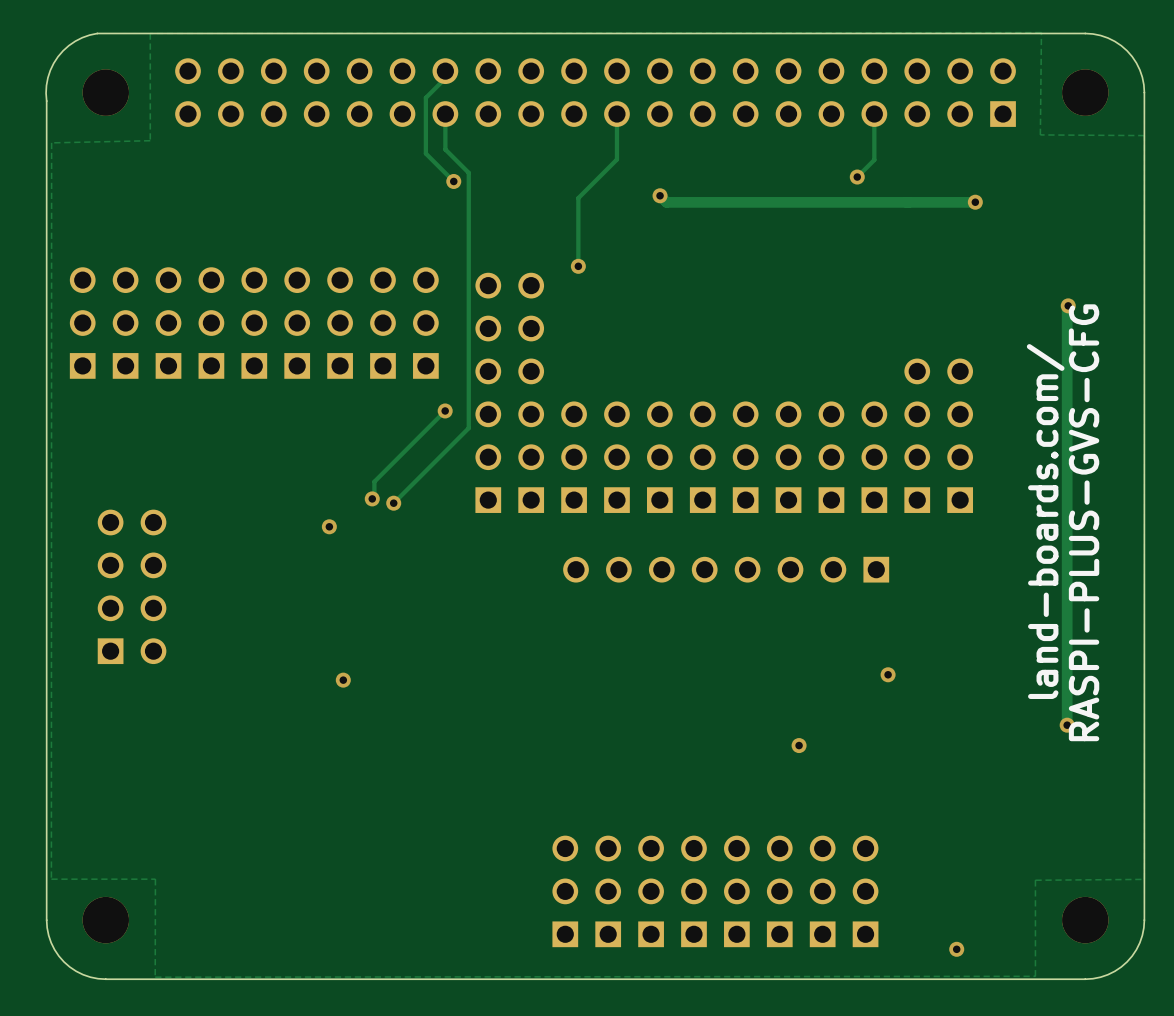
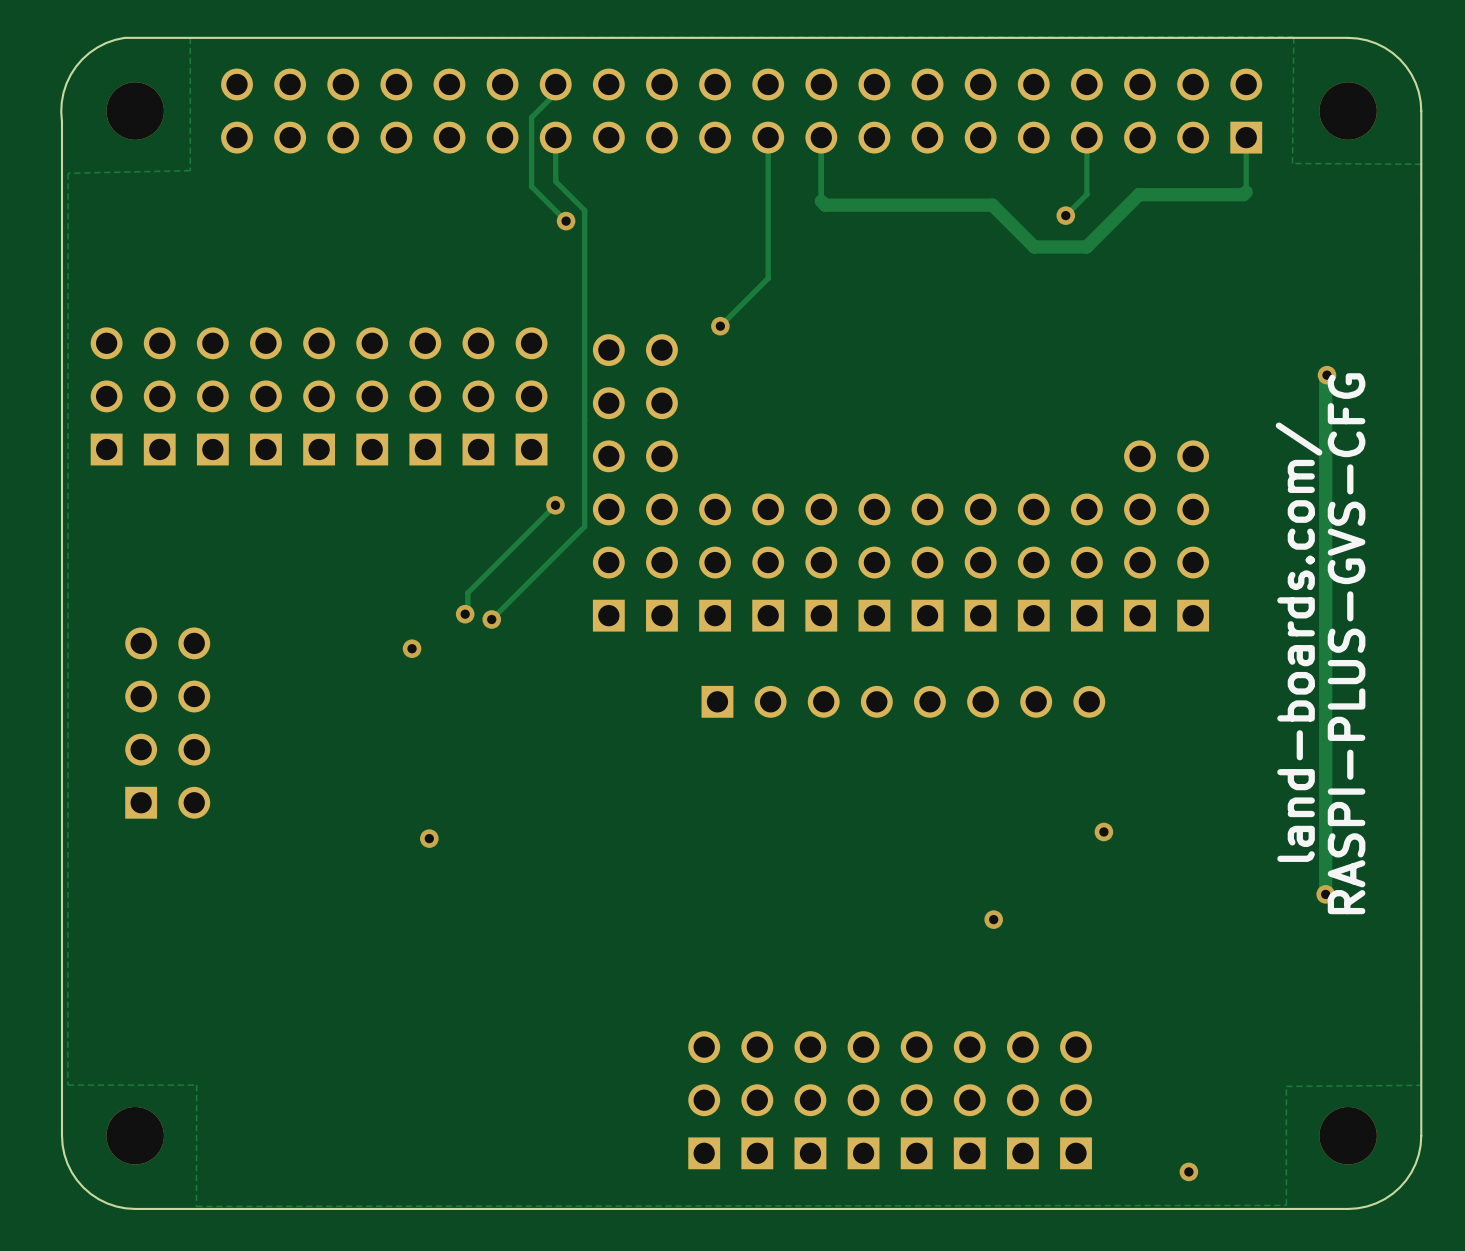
track: (616, 159) (578, 198) (578, 266) -> (768, 193) (768, 278) (720, 326)
track: (660, 195) (666, 202) (831, 202) -> (821, 137) (821, 201) (825, 205) (992, 205) (1034, 246)
via: (660, 195) -> none
track: (975, 202) (874, 202) -> (1246, 137) (1246, 191) (1243, 194) (1138, 194) (1086, 246)
via: (975, 202) -> none
part rotation: 0° (726, 569) -> 180° (903, 701)

